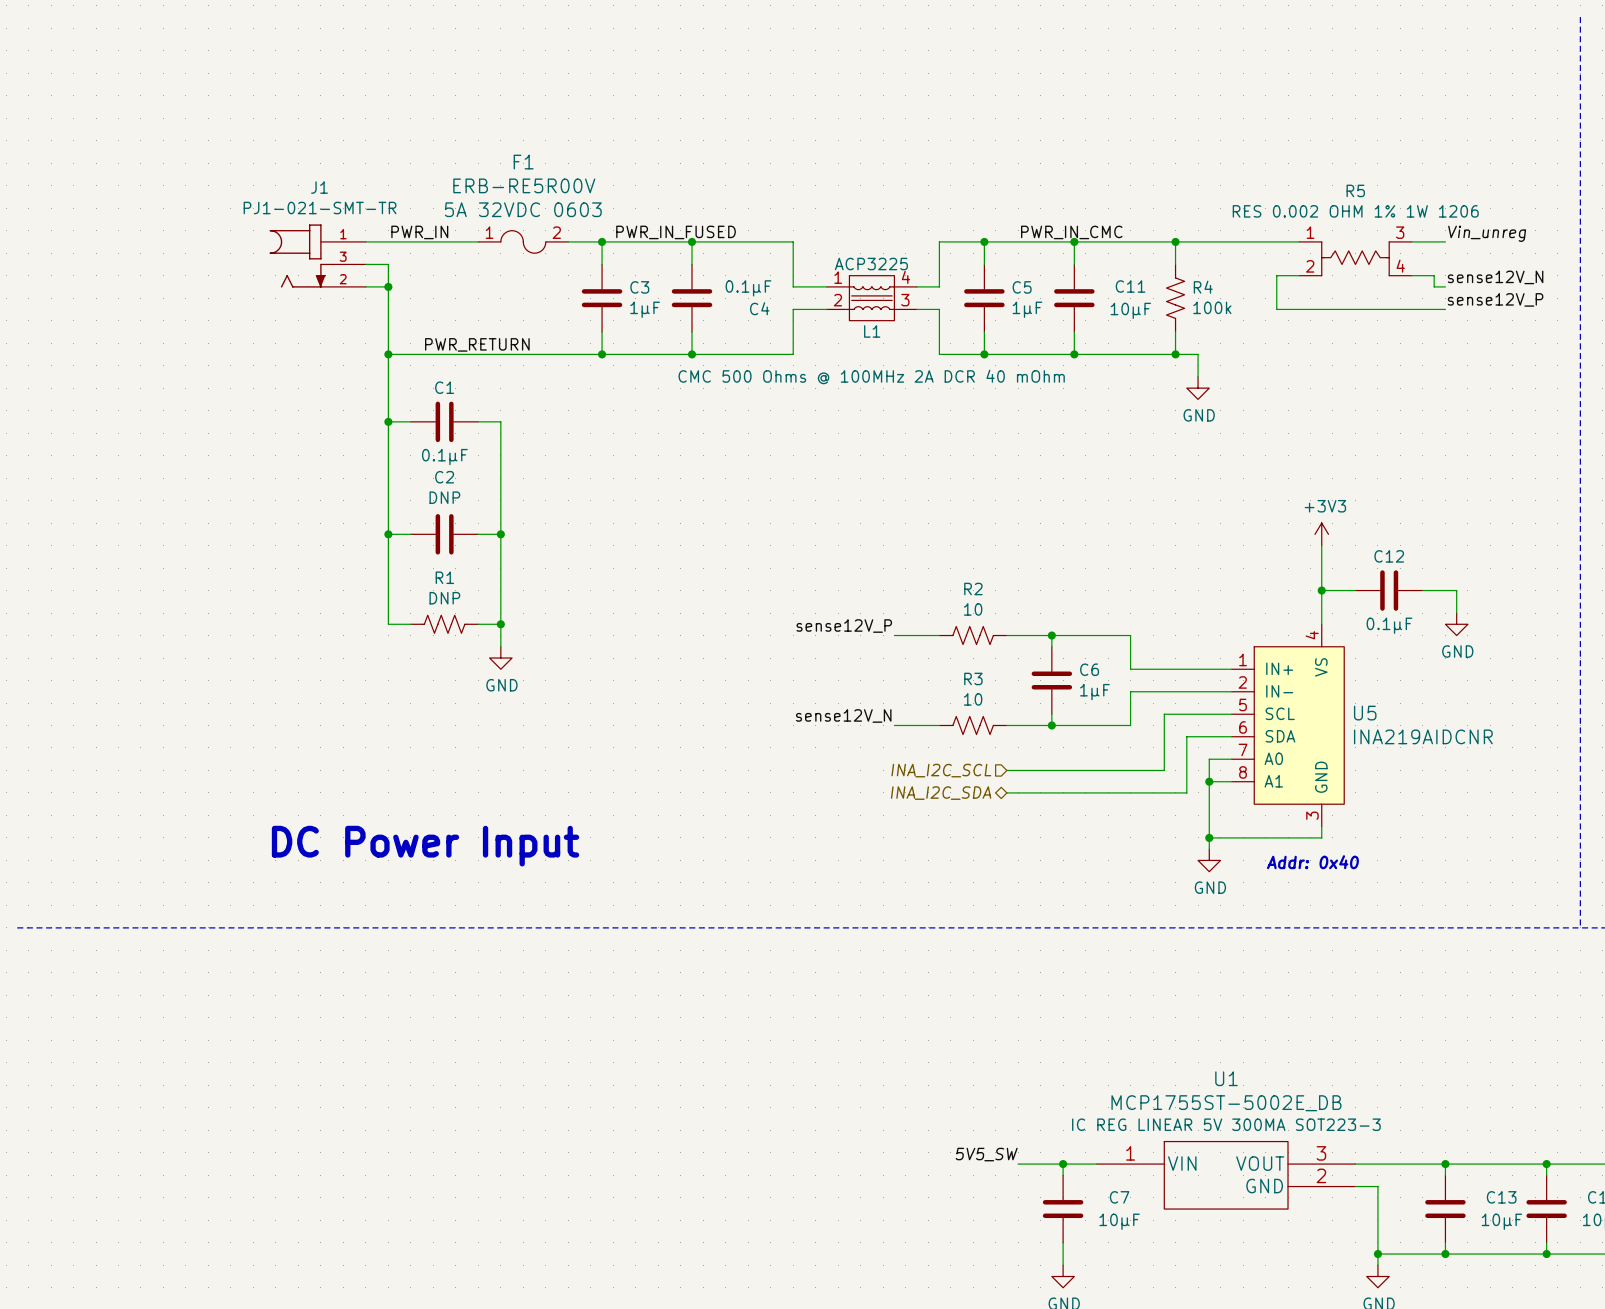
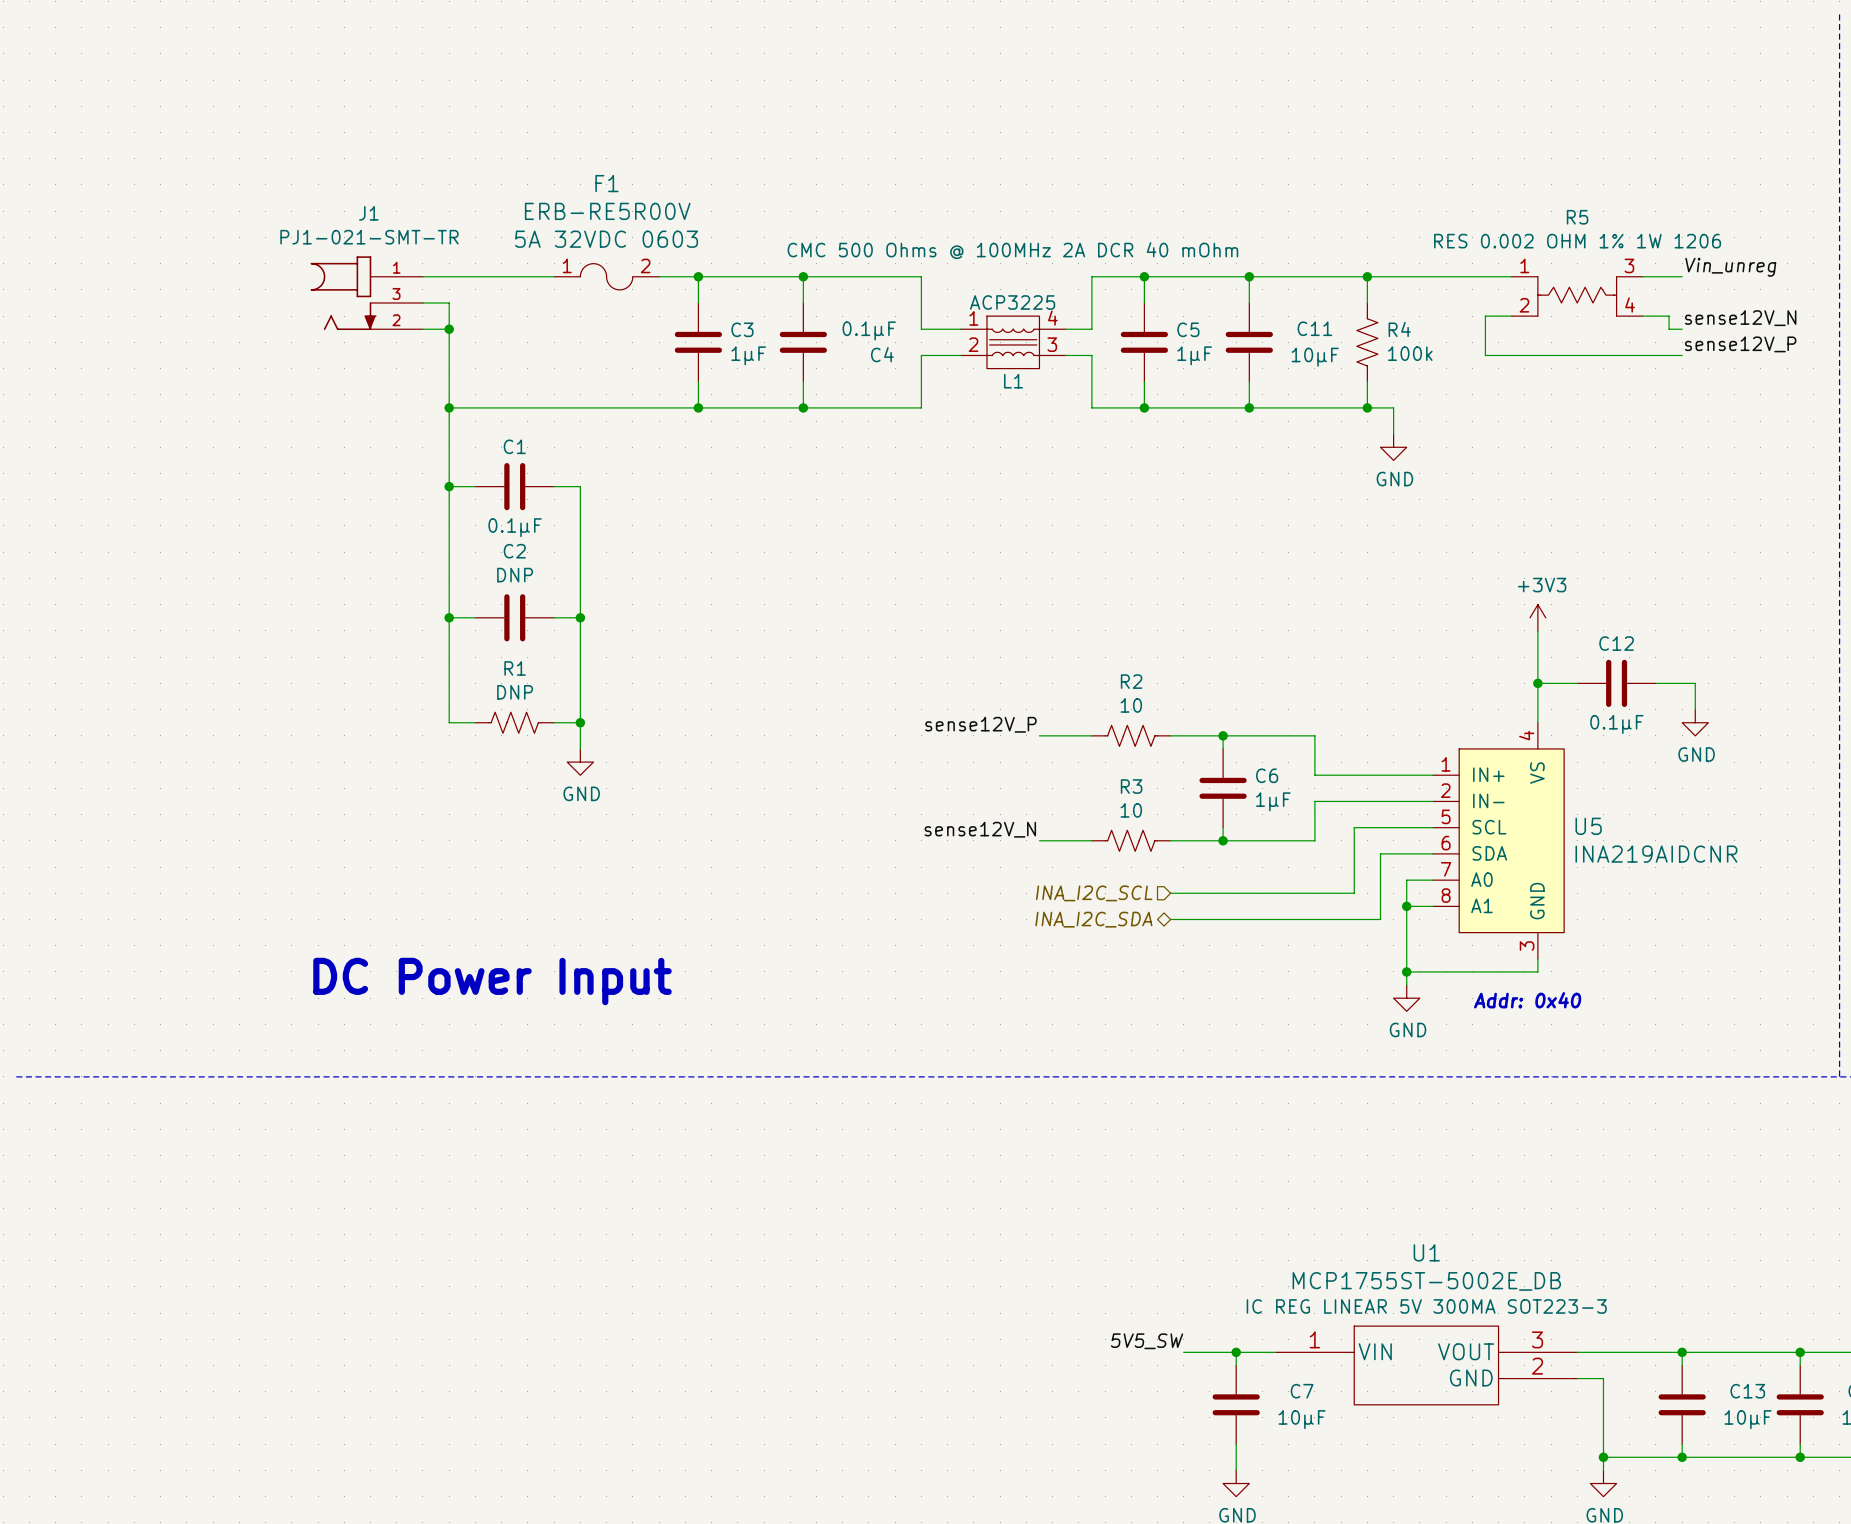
label: PWR_IN (419, 232) -> none
label: PWR_IN_FUSED (676, 232) -> none
label: PWR_IN_CMC (1071, 232) -> none
label: PWR_RETURN (477, 344) -> none
L1 text position: CMC 500 Ohms @ 100MHz 2A DCR 40 mOhm (871, 377) -> CMC 500 Ohms @ 100MHz 2A DCR 40 mOhm (1012, 250)

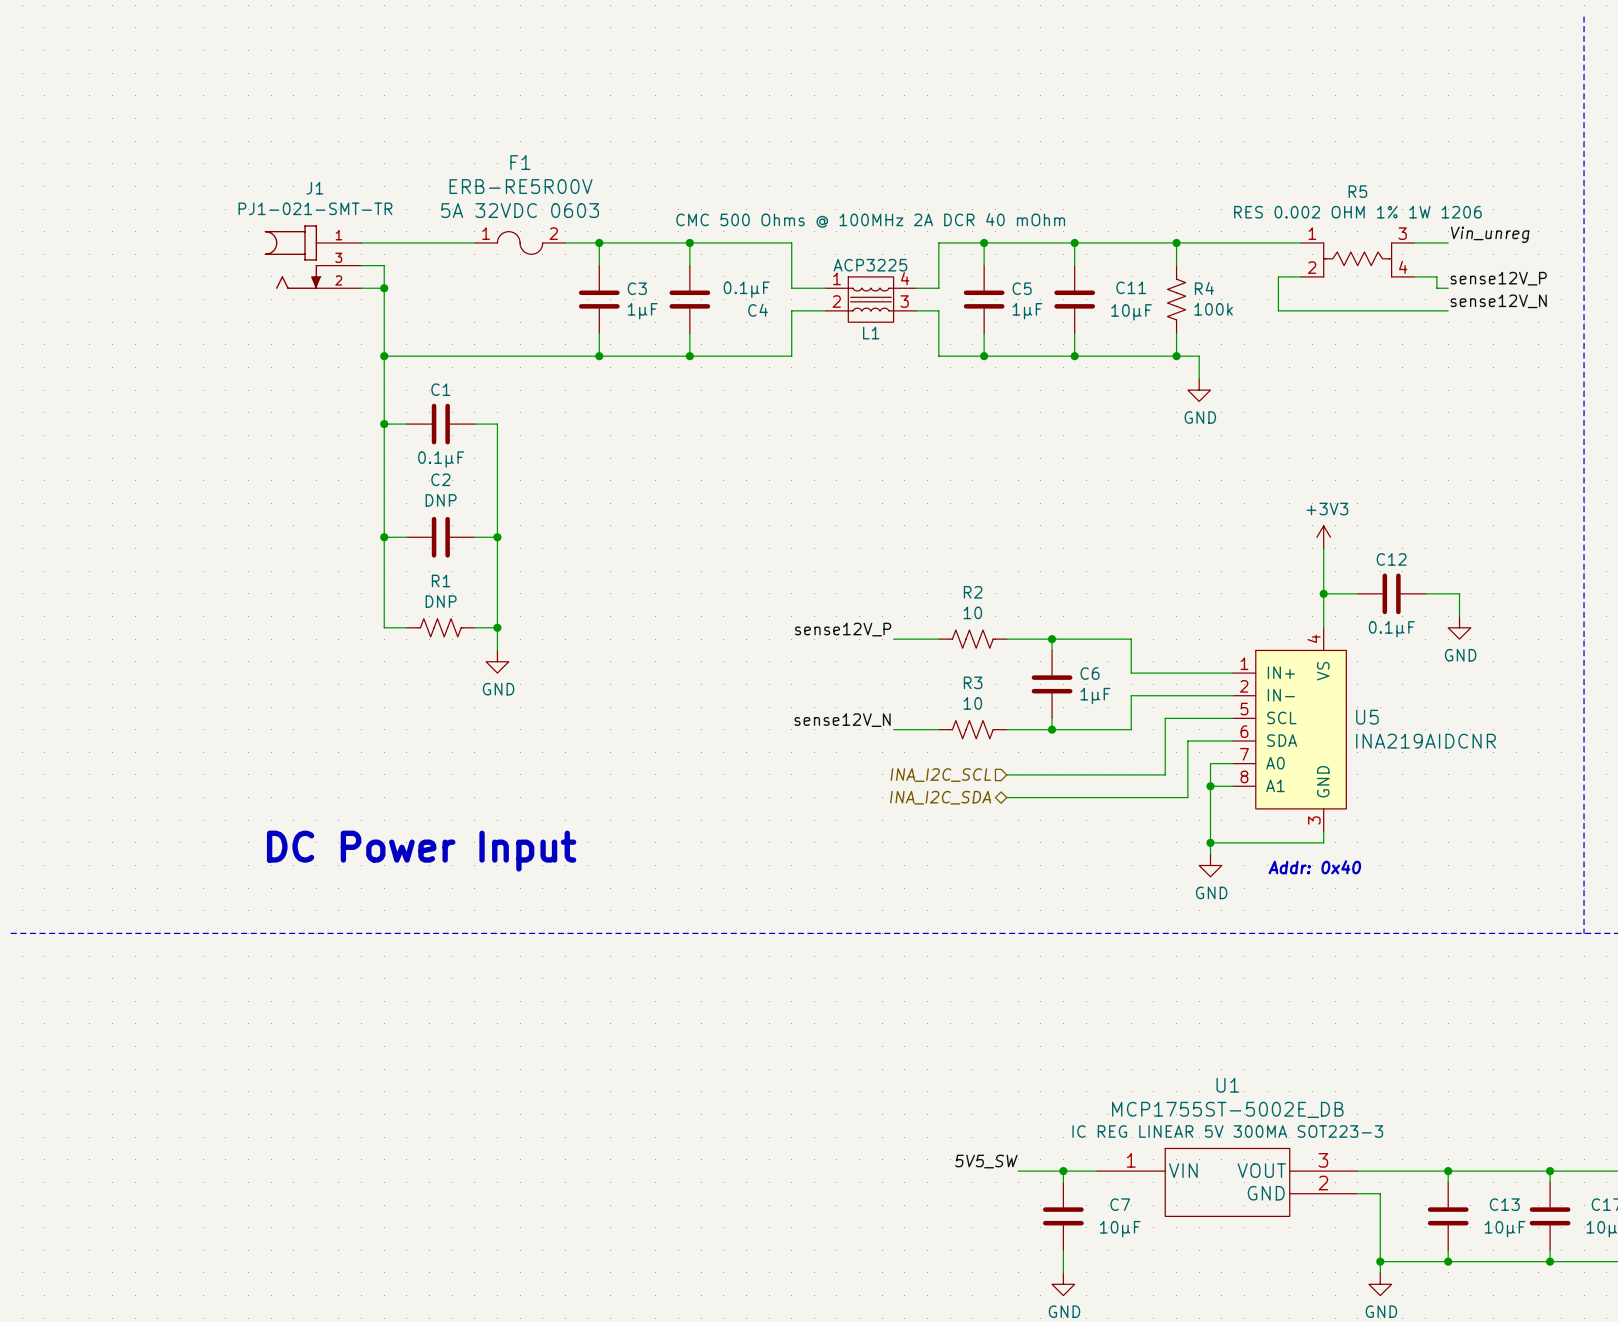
label: sense12V_N (1740, 318) -> sense12V_P (1498, 278)
label: sense12V_P (1740, 344) -> sense12V_N (1498, 301)

